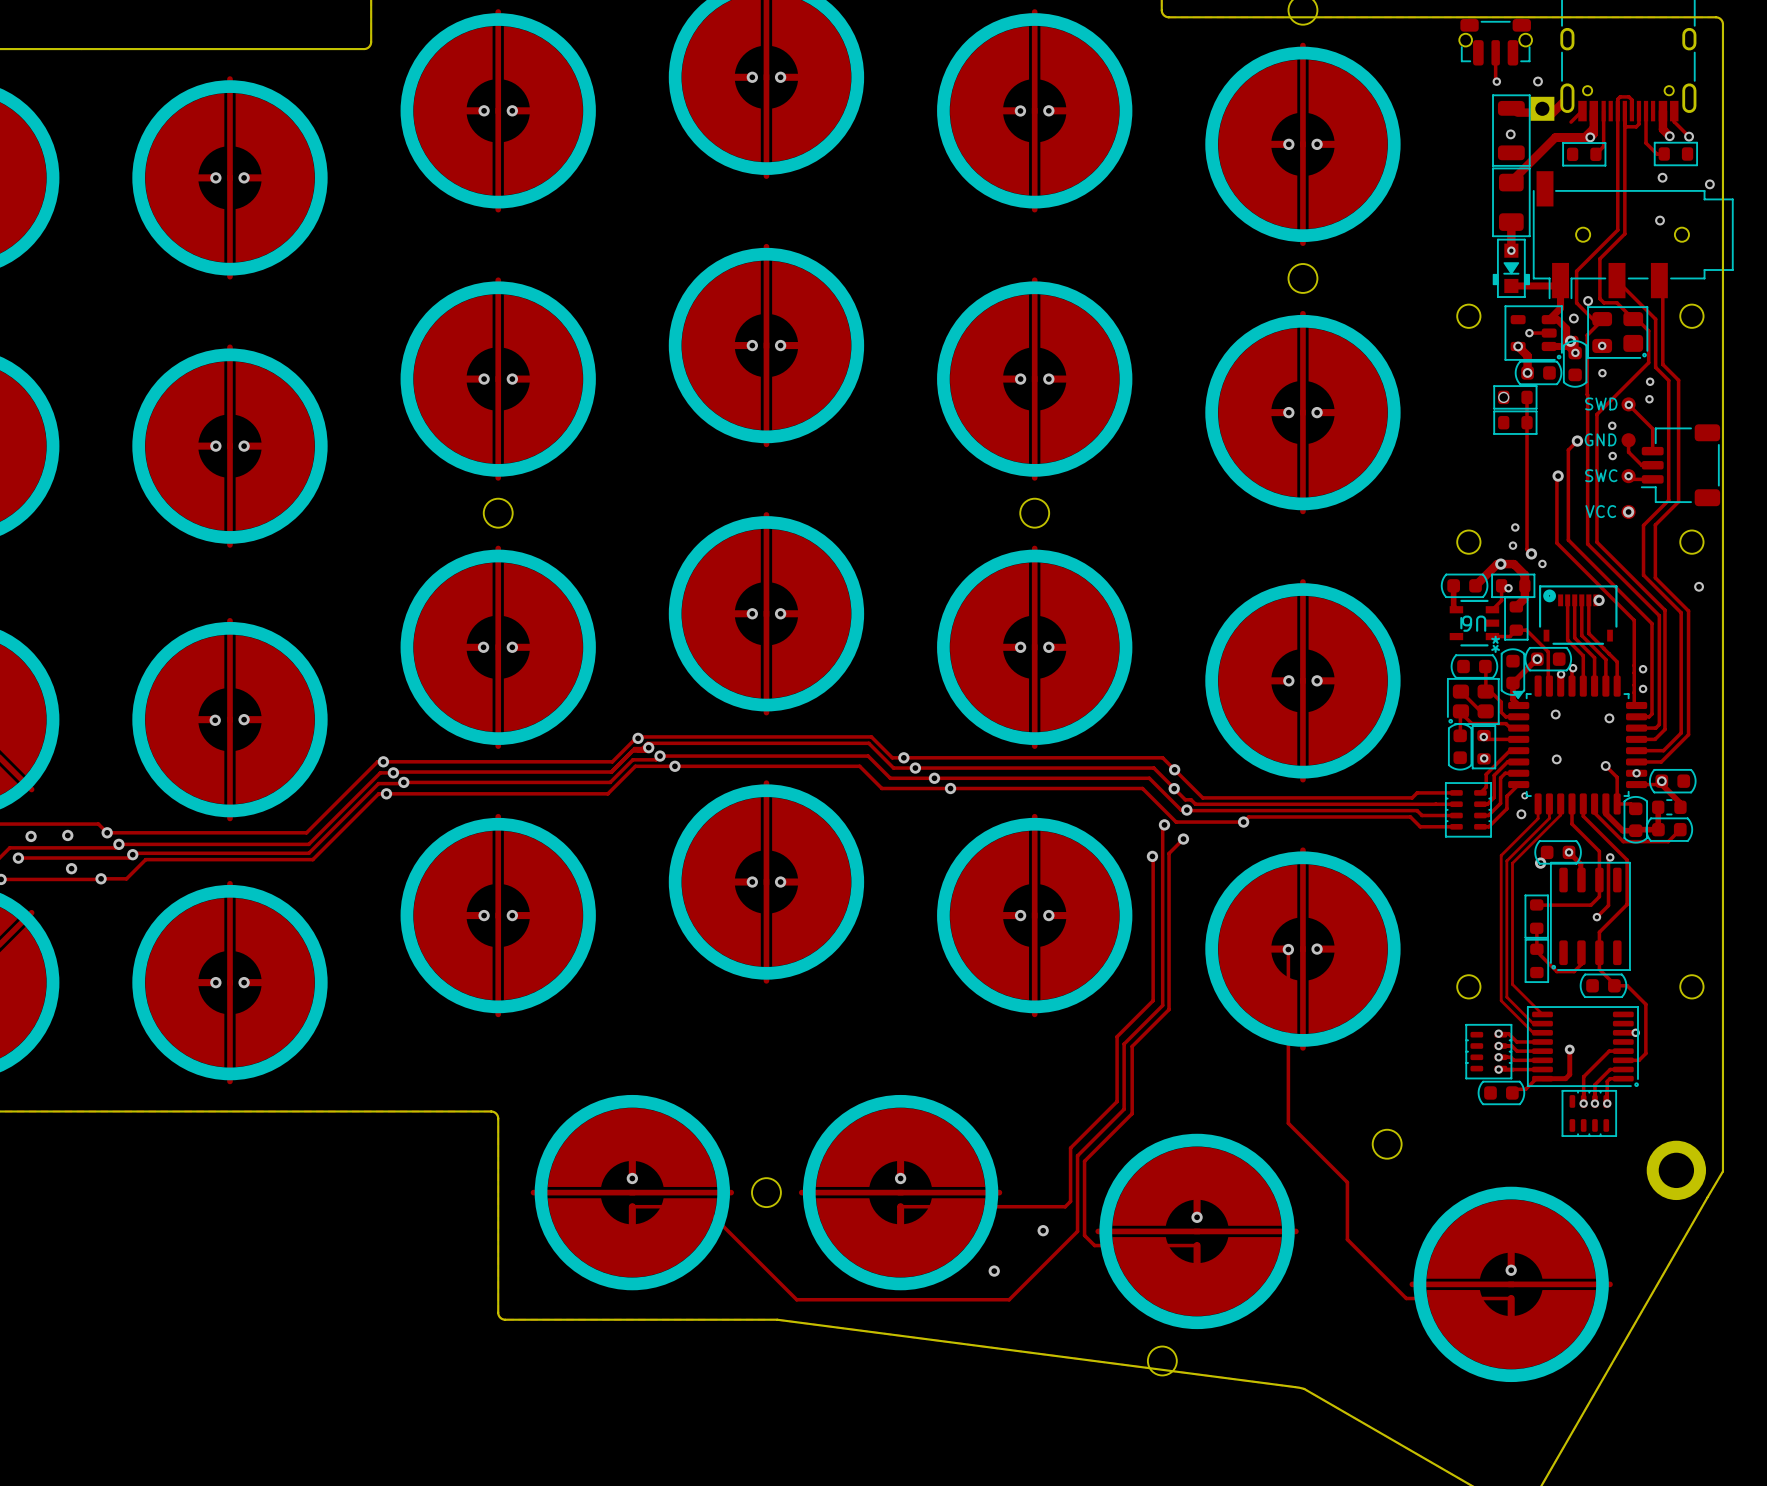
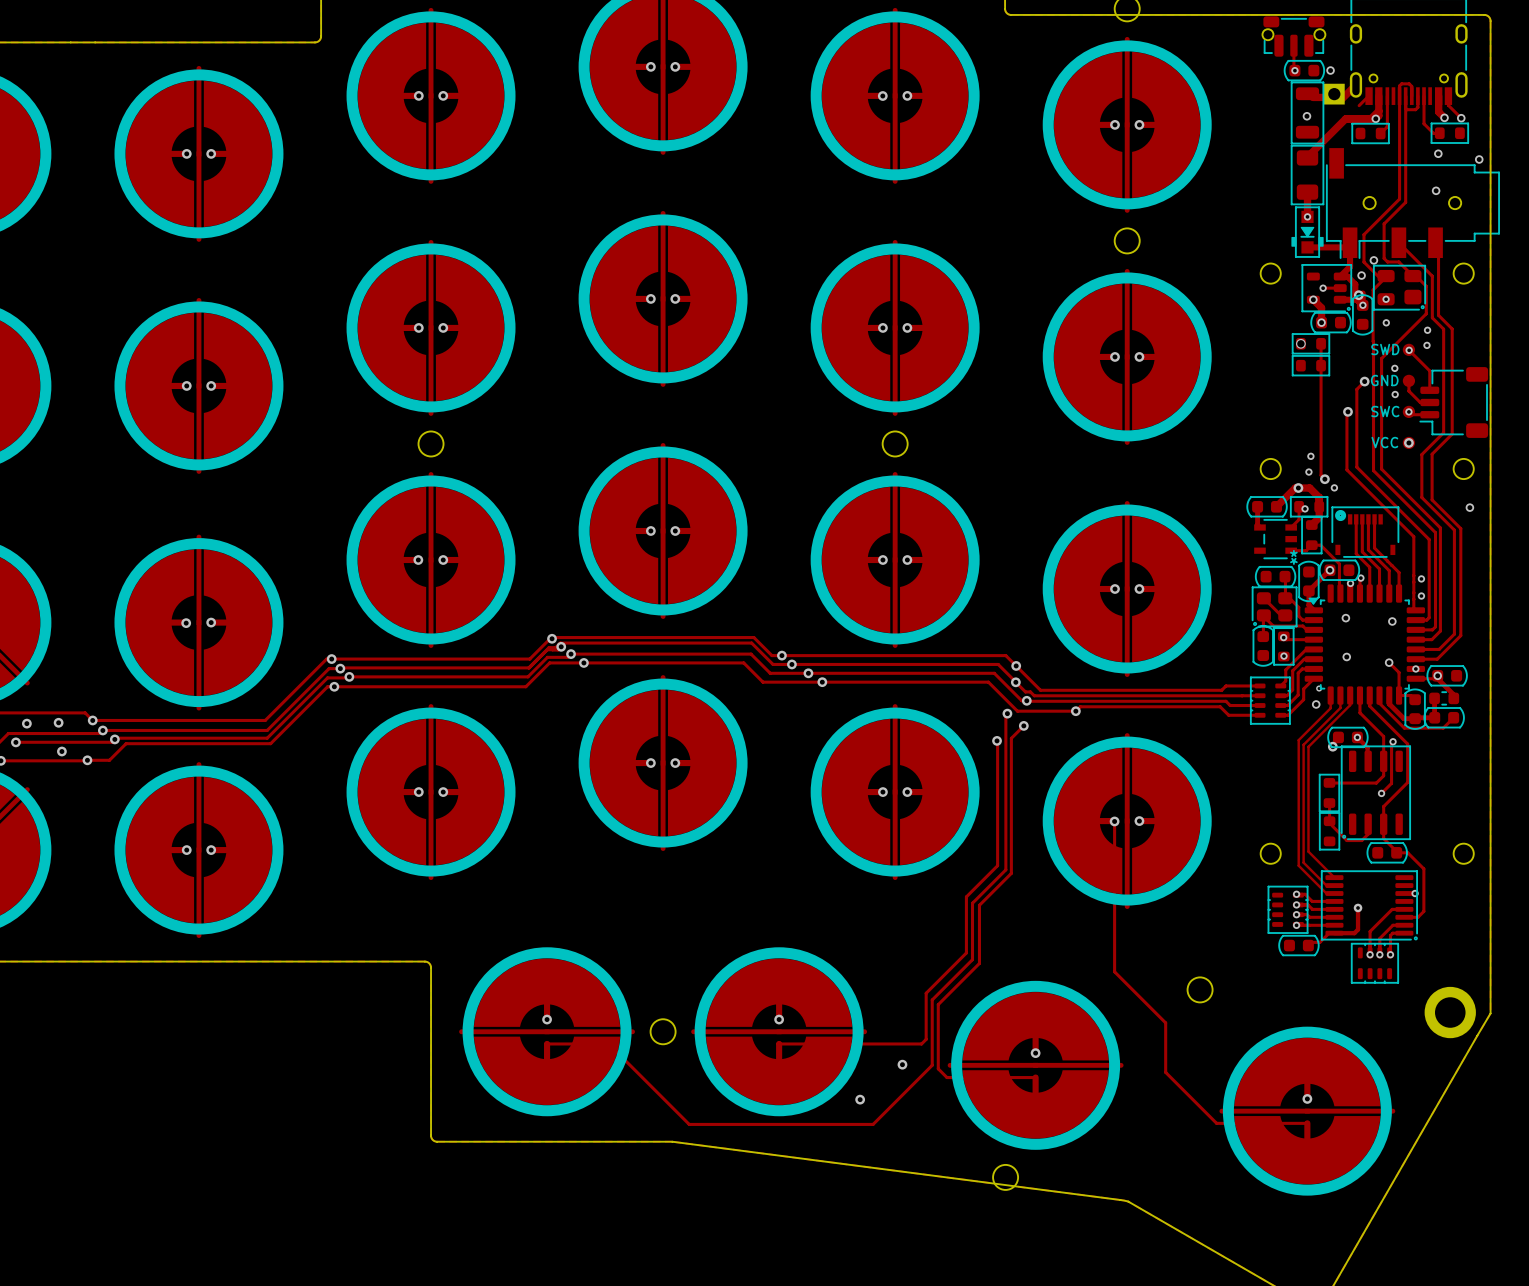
part: none -> (1304, 70)
via: (1599, 600) -> none
U6 name: U6 (1474, 623) -> none

